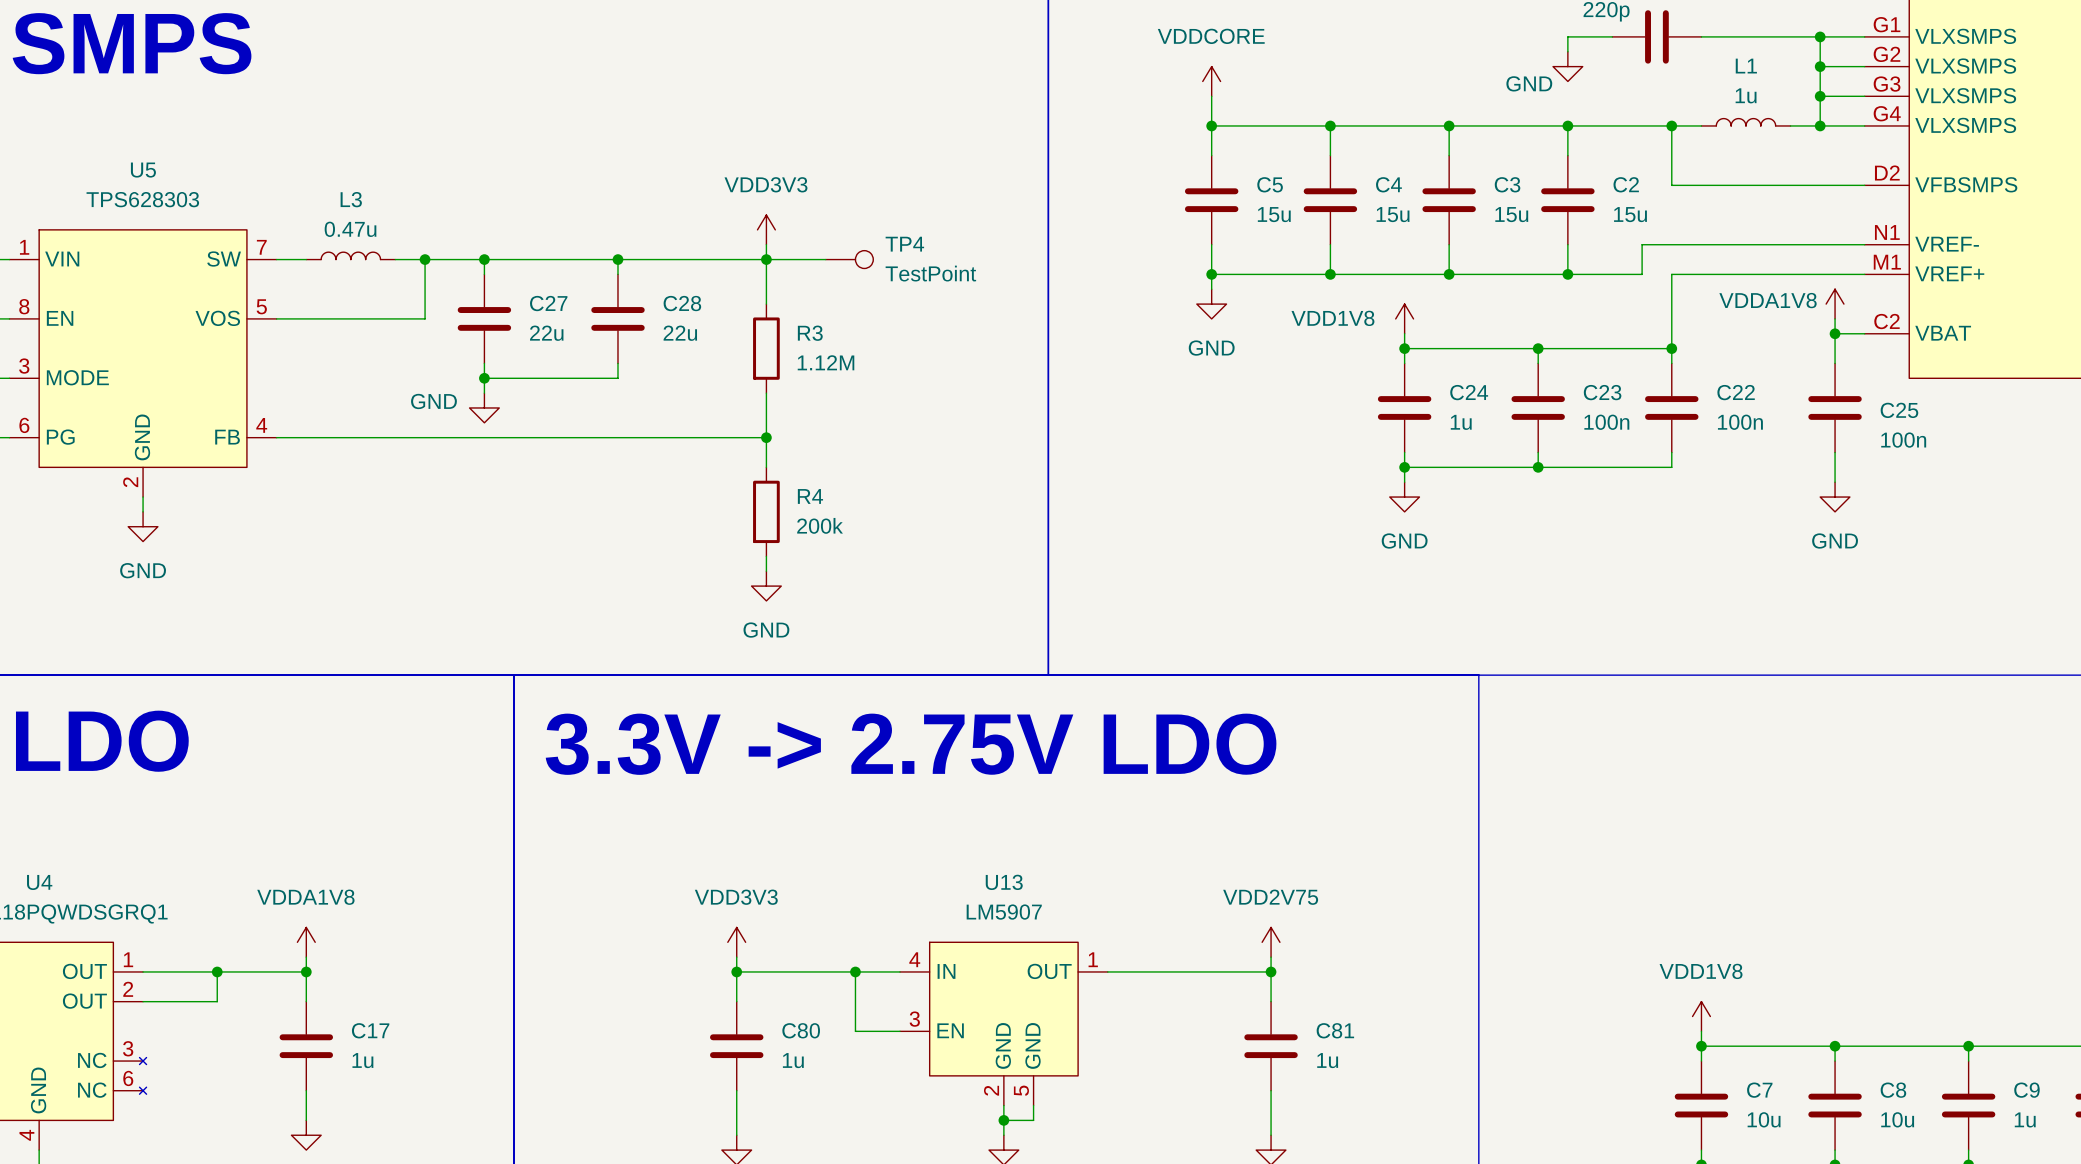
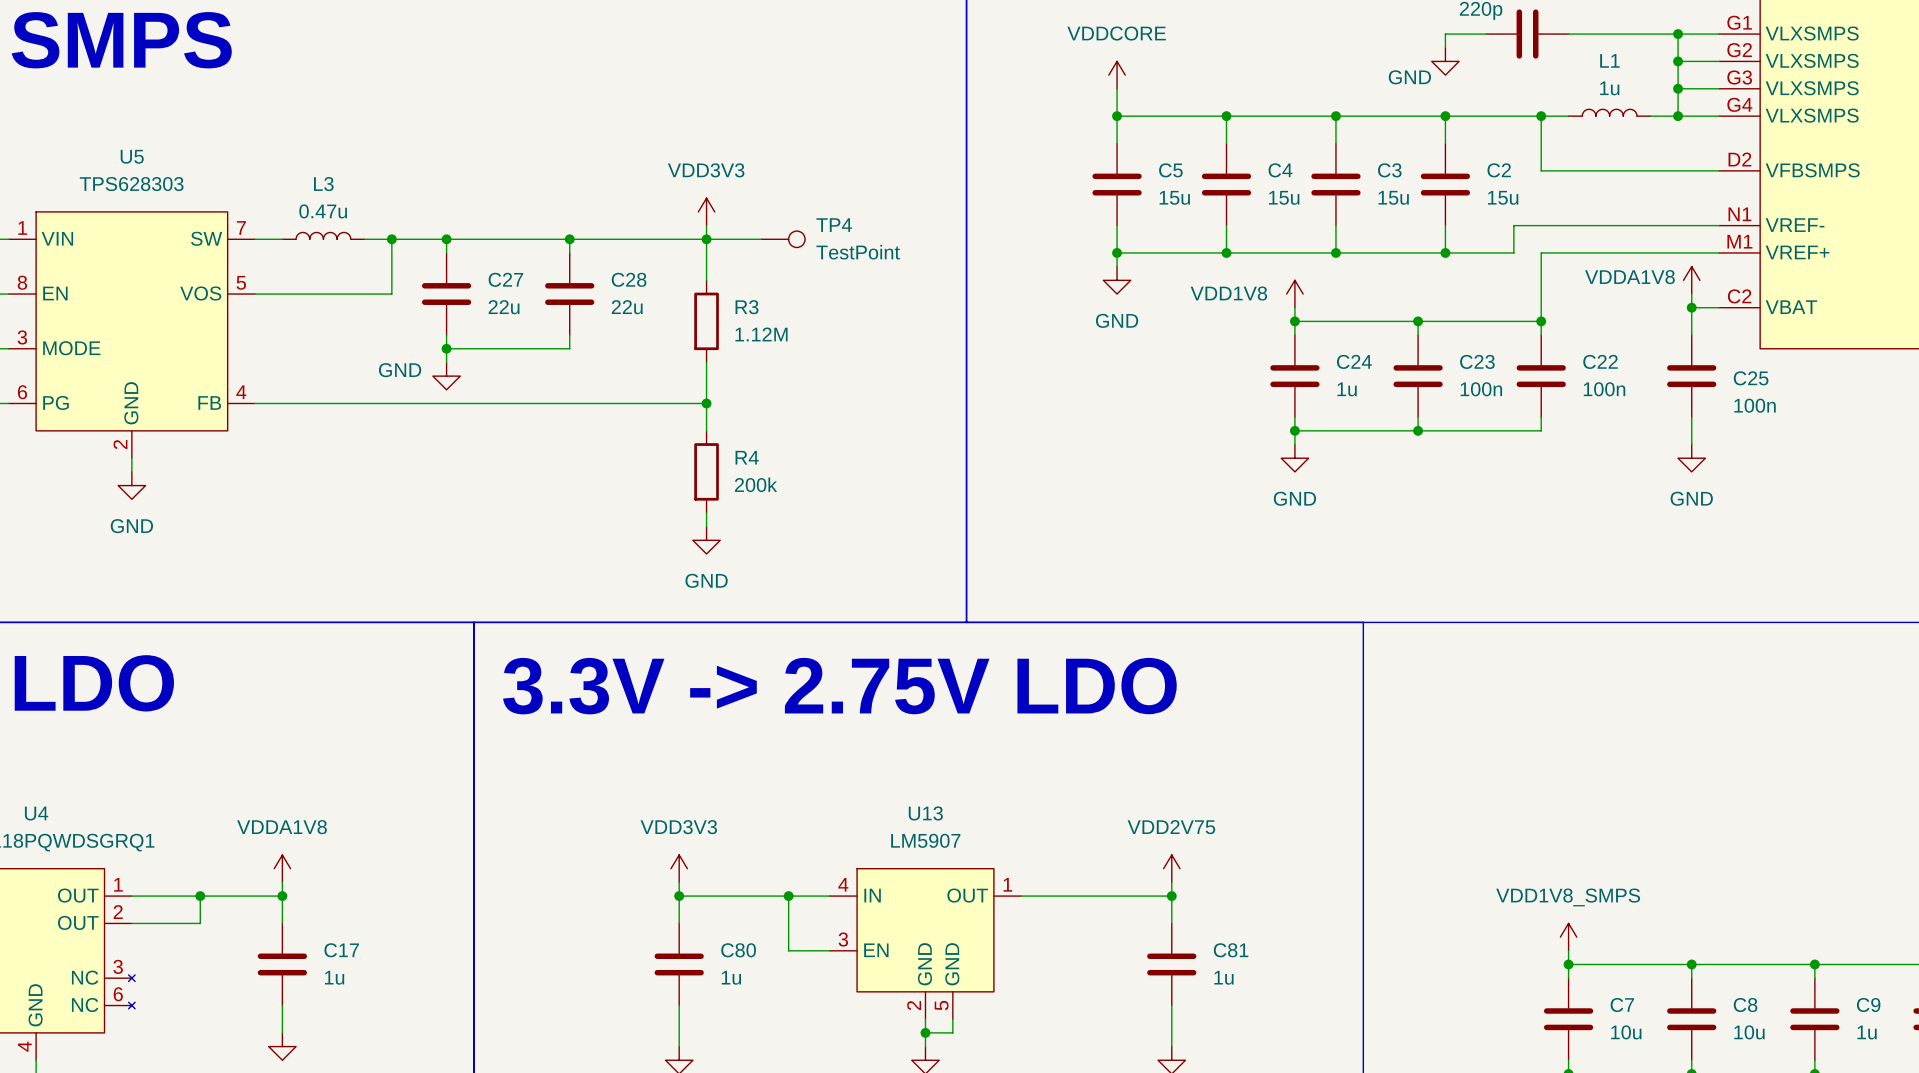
power symbol: VDD1V8 (1701, 1016) -> VDD1V8_SMPS (1568, 937)

